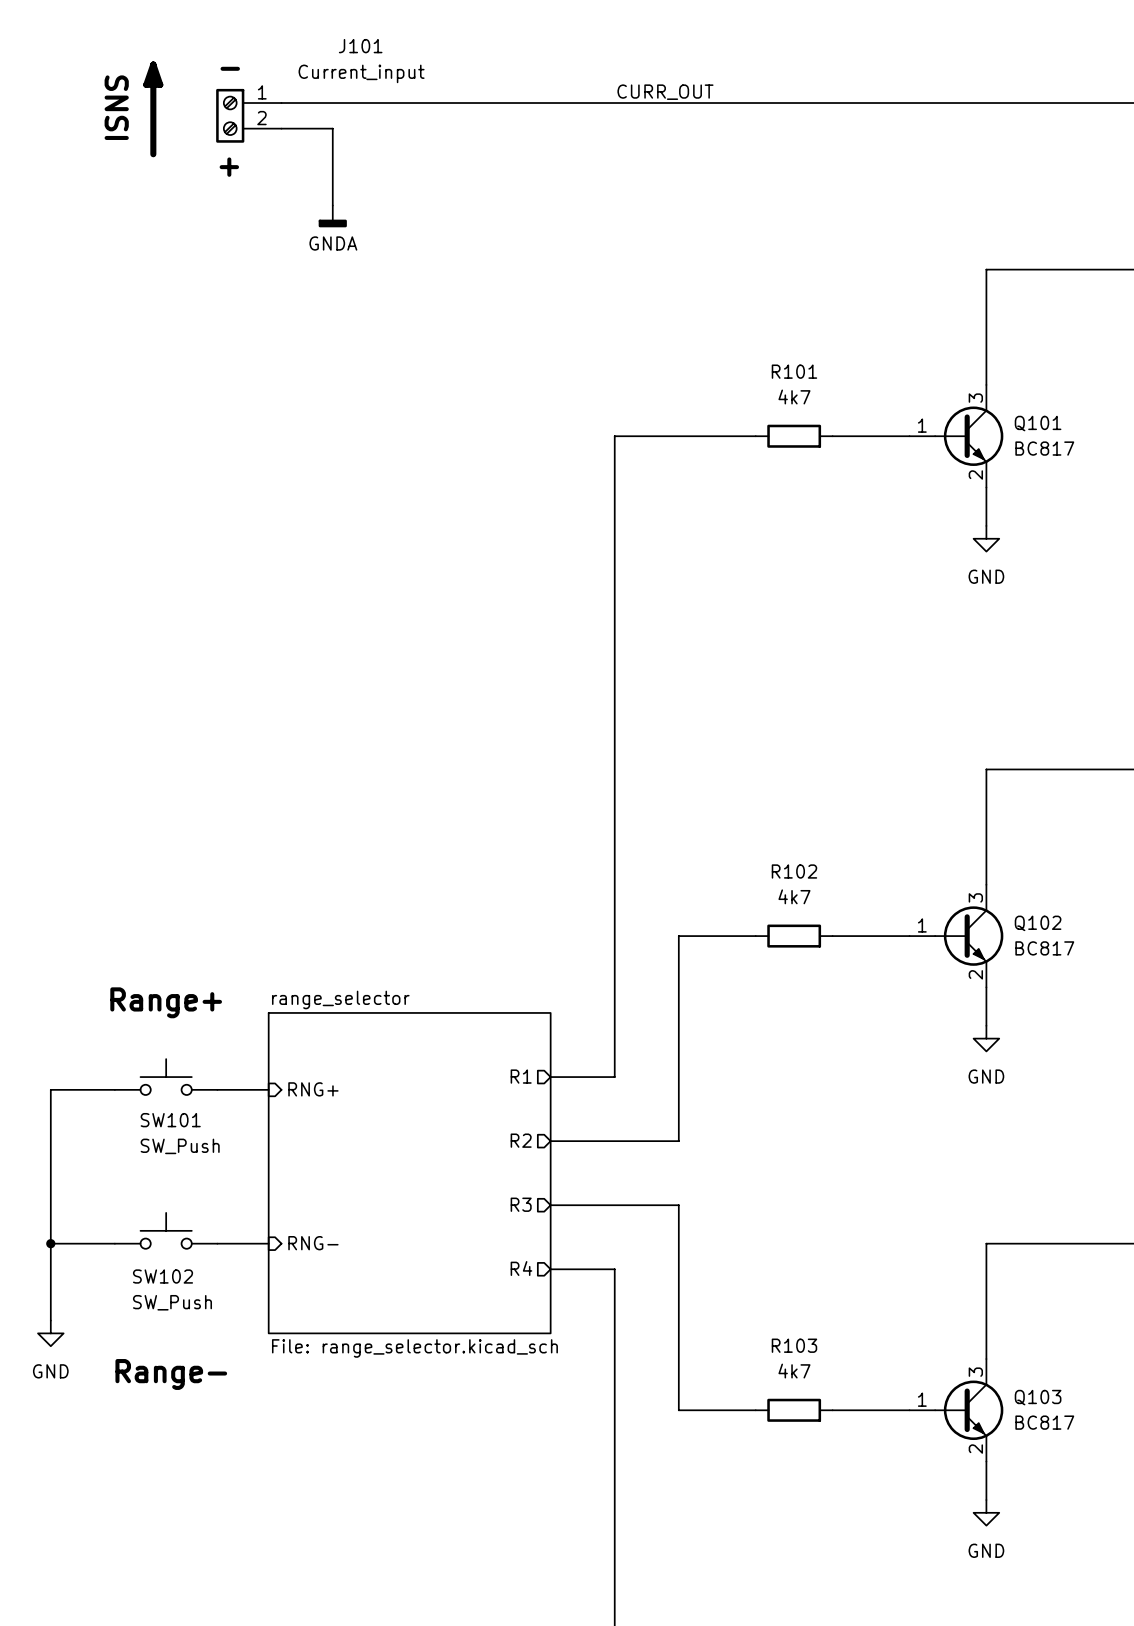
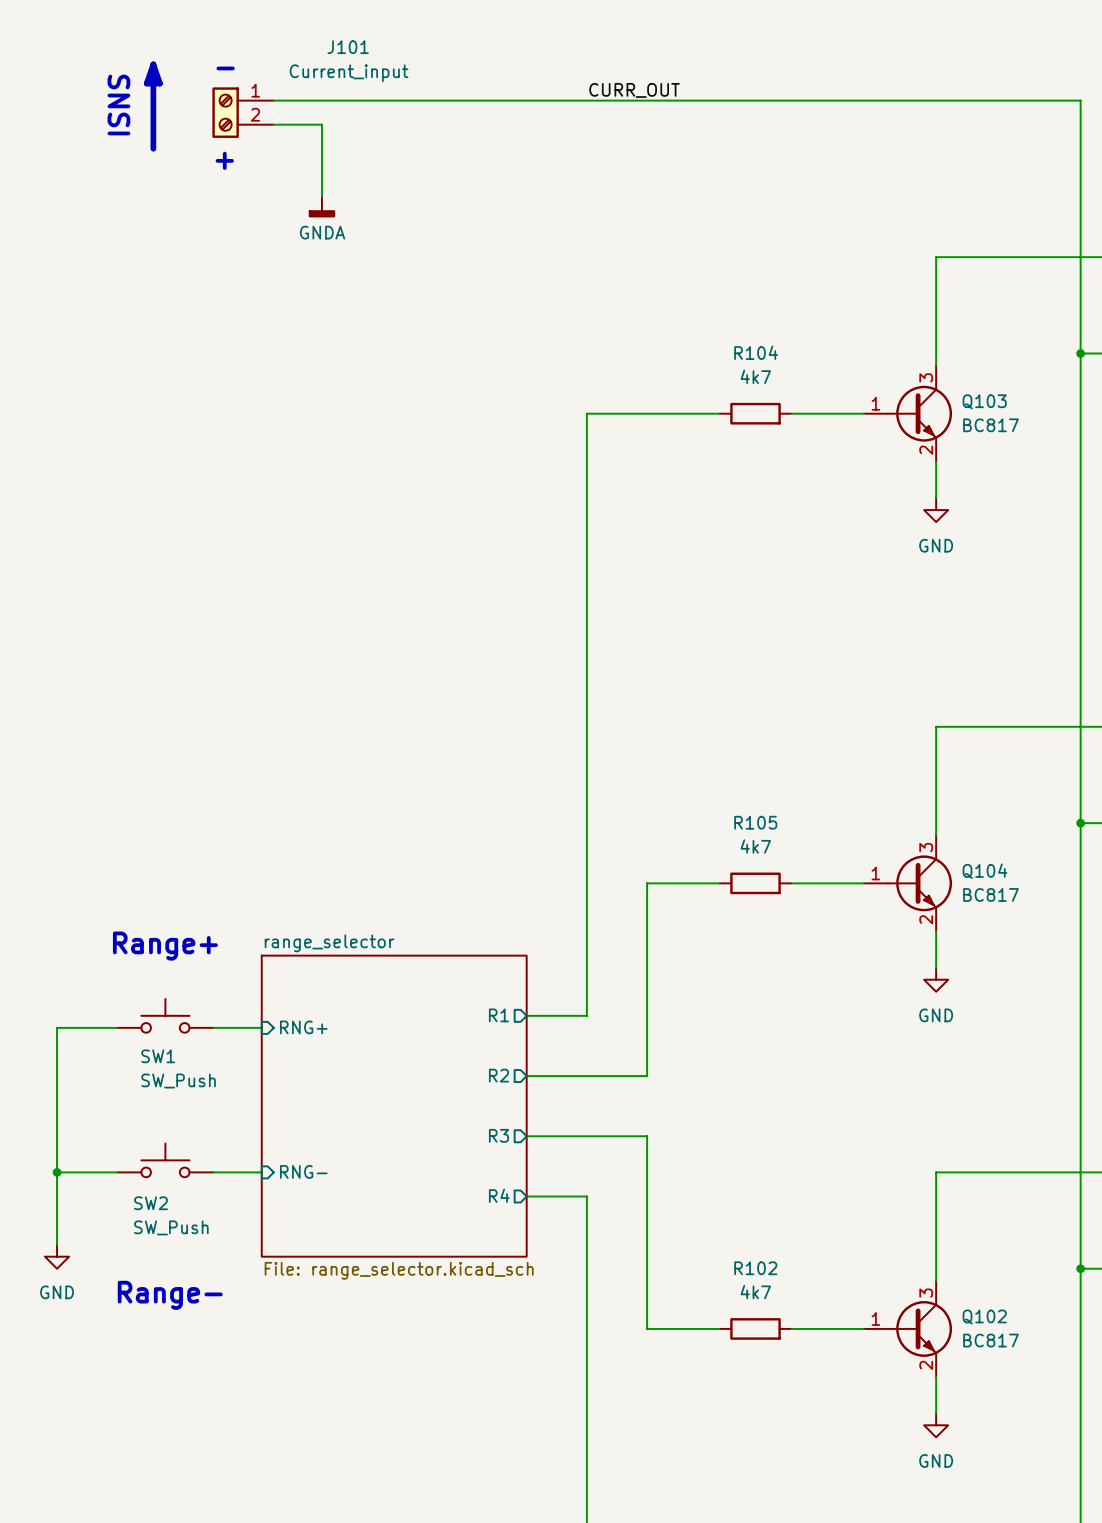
R101 name: R101 (794, 371) -> R104 (756, 352)
Q101 name: Q101 (1038, 423) -> Q103 (984, 401)
R102 name: R102 (794, 871) -> R105 (755, 822)
Q102 name: Q102 (1038, 923) -> Q104 (984, 871)
SW101 name: SW101 (170, 1120) -> SW1 (158, 1056)
SW102 name: SW102 (163, 1276) -> SW2 (150, 1203)
R103 name: R103 (794, 1345) -> R102 (755, 1268)
Q103 name: Q103 (1038, 1397) -> Q102 (984, 1317)

